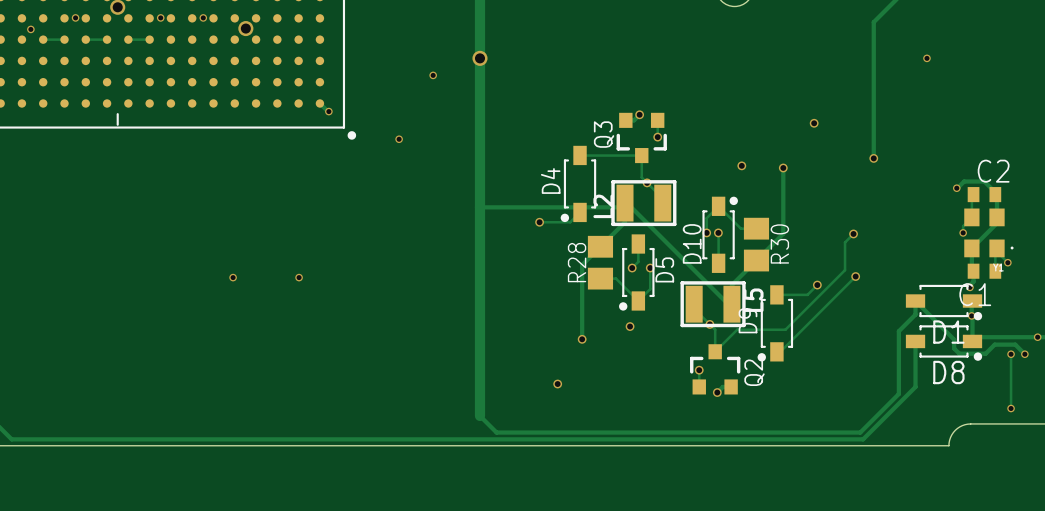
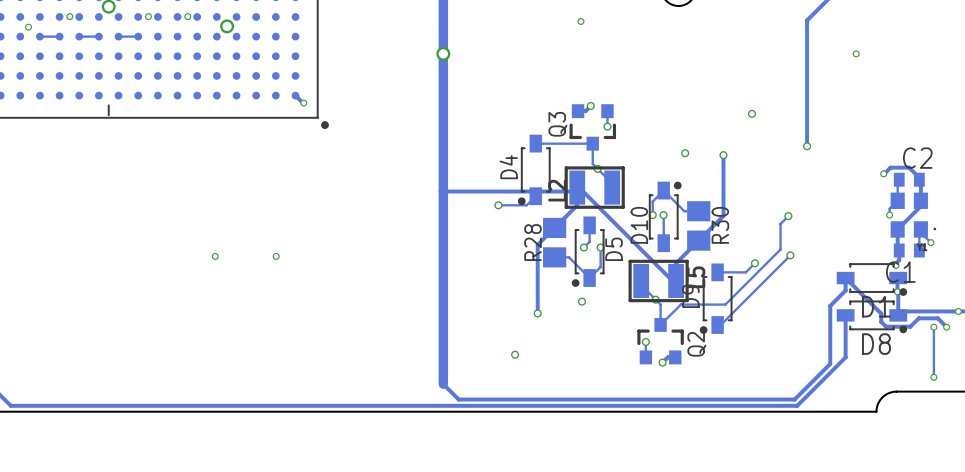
via: none -> (580, 21)
via: (433, 75) -> none
via: (399, 139) -> none

